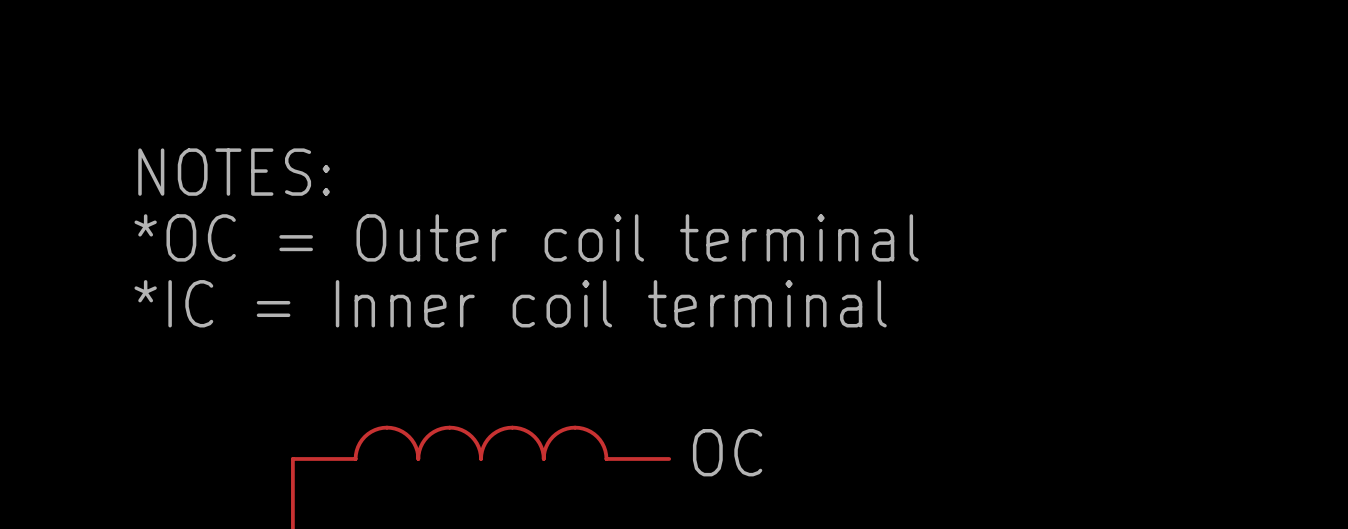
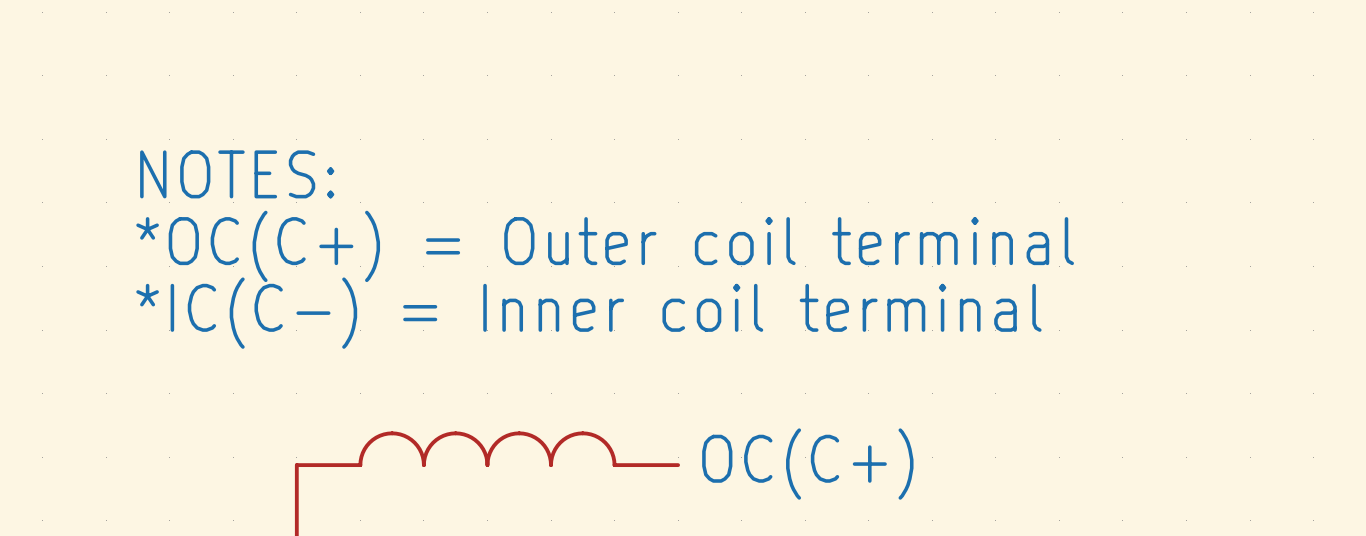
text: *OC = Outer coil terminal (526, 237) -> *OC(C+) = Outer coil terminal (605, 246)
text: *IC = Inner coil terminal (510, 303) -> *IC(C-) = Inner coil terminal (588, 313)
text: OC (727, 452) -> OC(C+) (807, 464)

